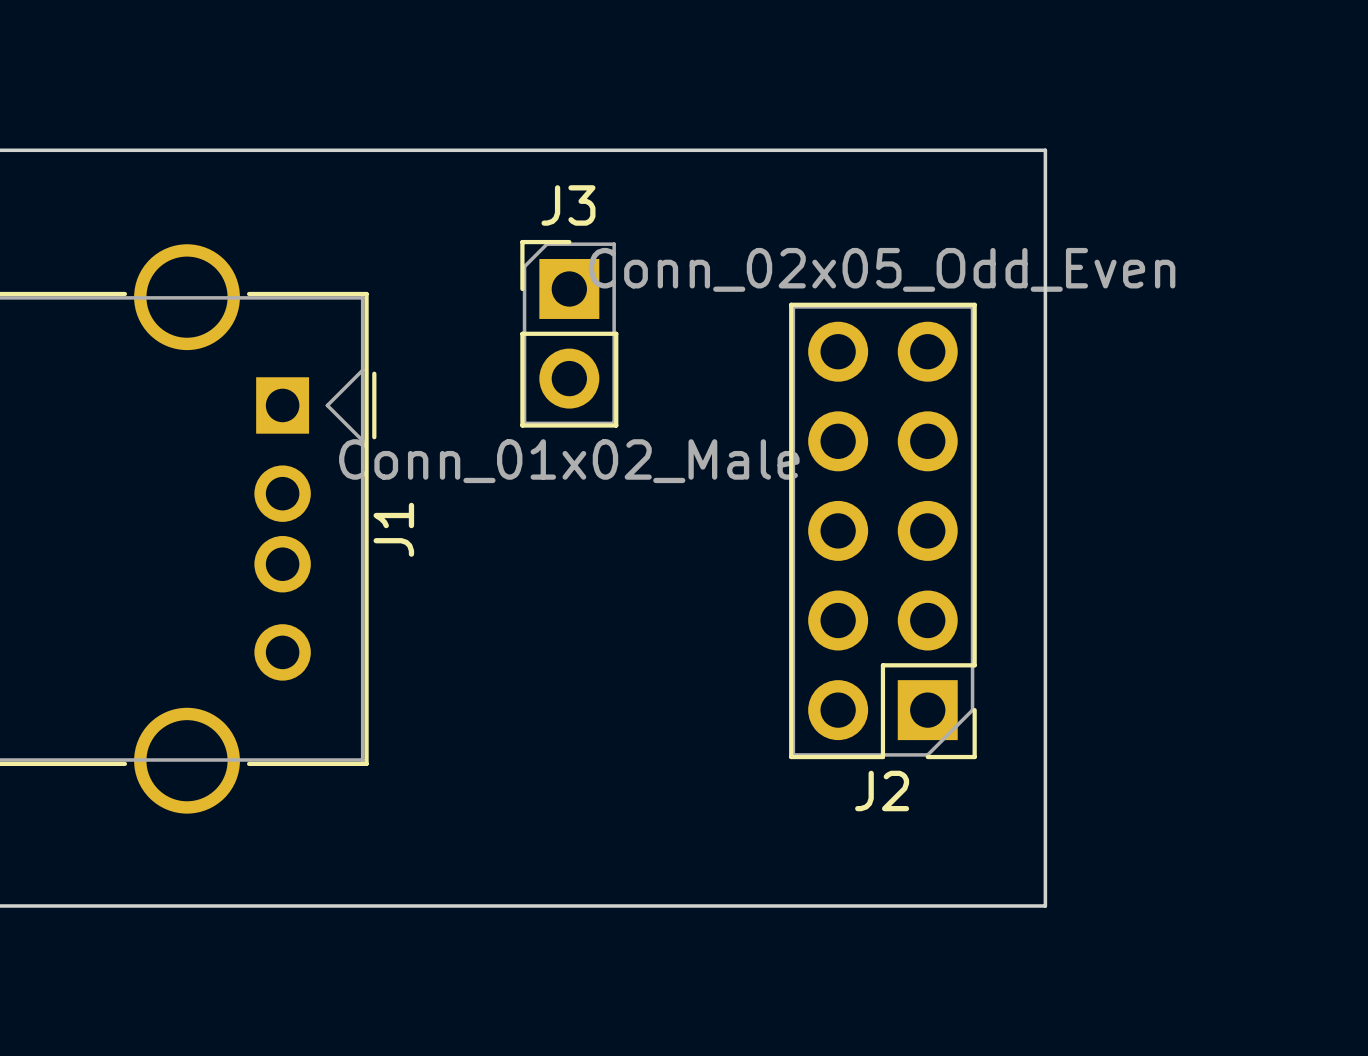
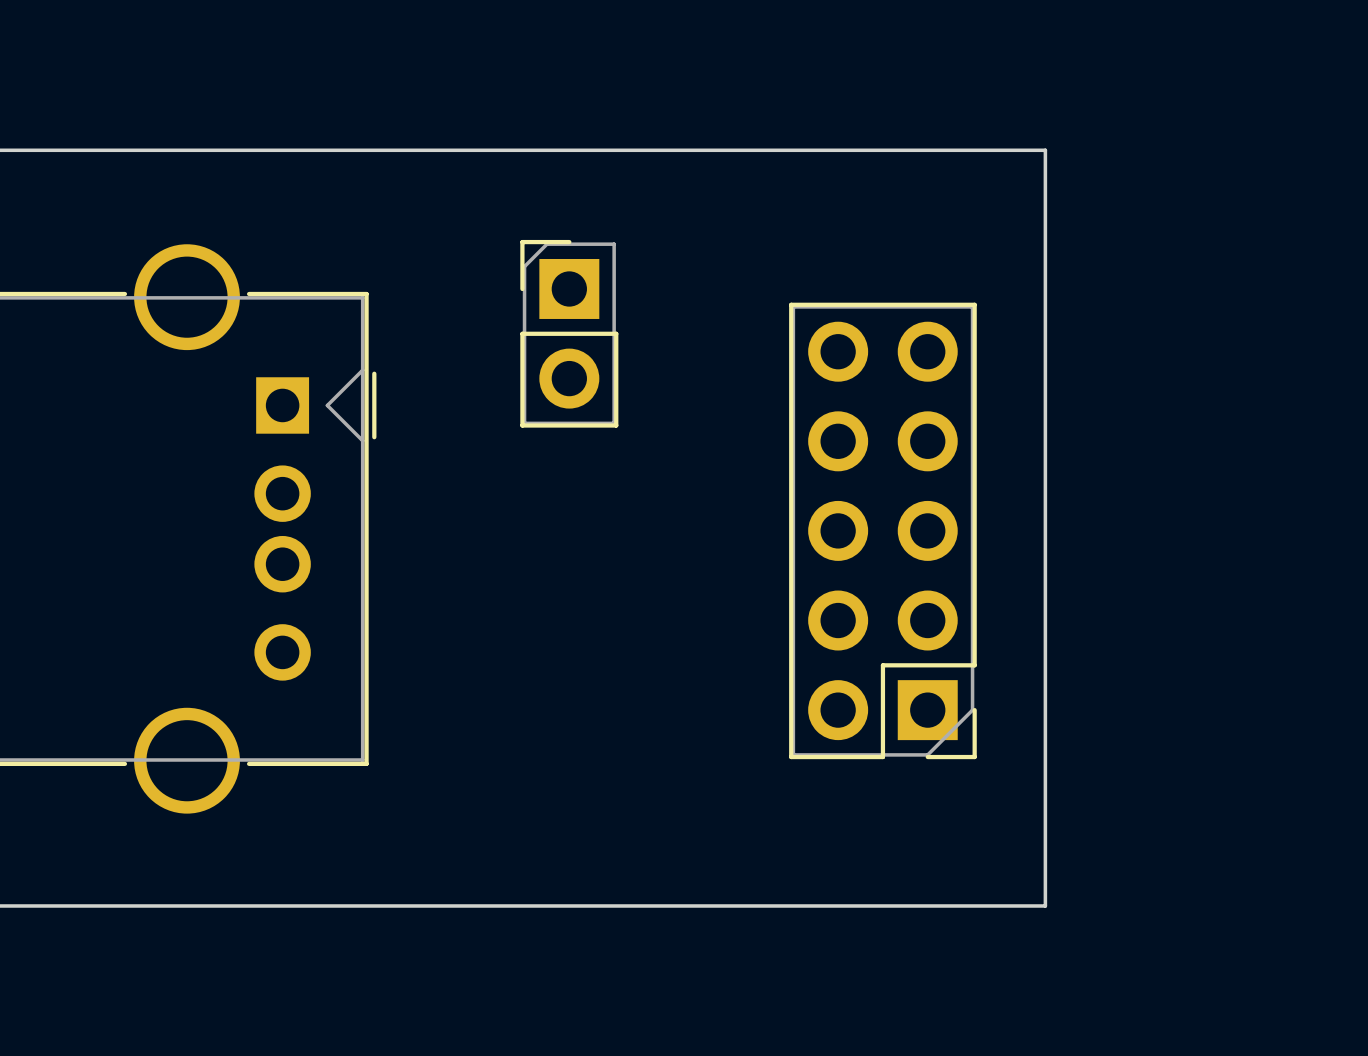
J3 name: J3 (568, 205) -> none
J2 value: Conn_02x05_Odd_Even (882, 269) -> none
J3 value: Conn_01x02_Male (569, 461) -> none
J1 name: J1 (393, 529) -> none
J2 name: J2 (882, 790) -> none

